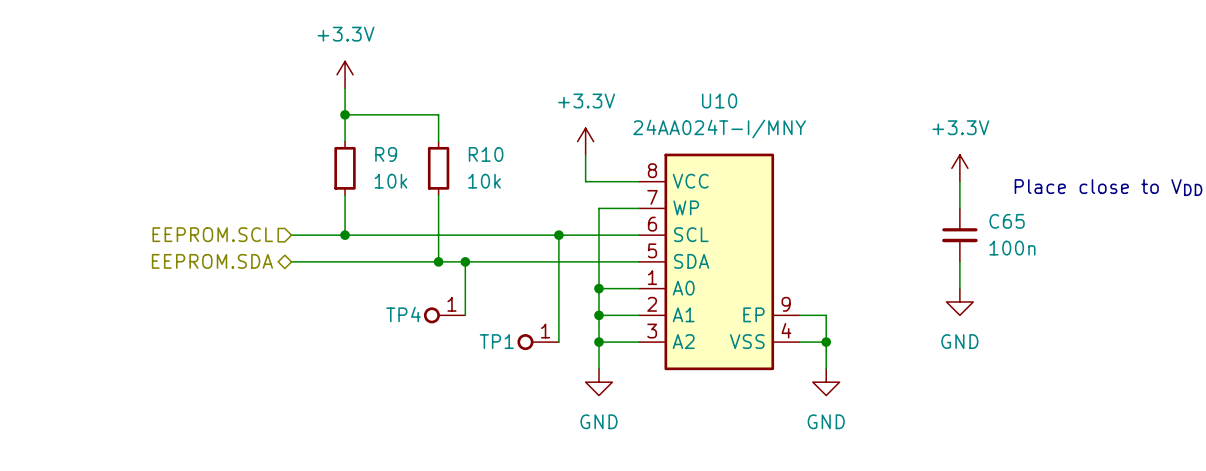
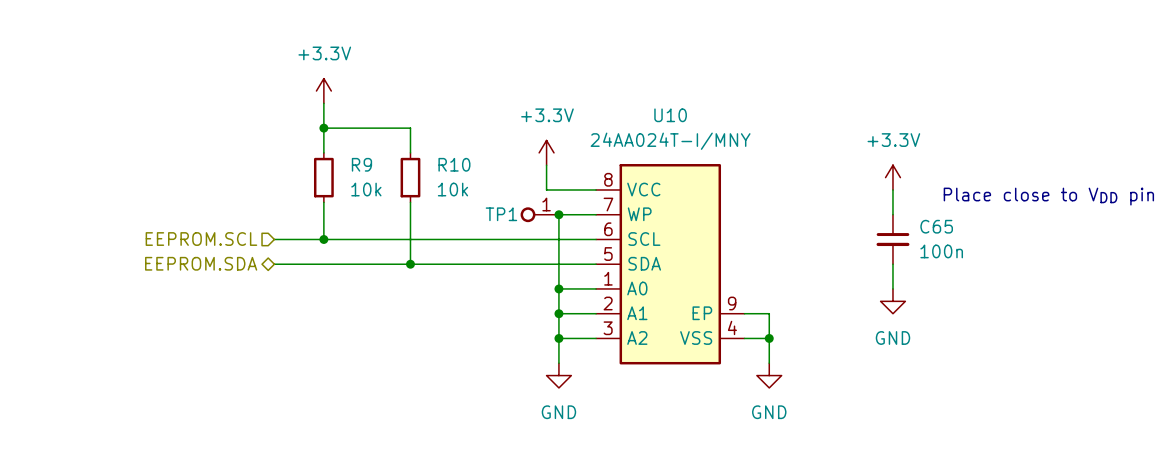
wire: (558, 235) (558, 342) -> none
junction position: (558, 235) -> (558, 214)
wire: (465, 261) (465, 315) -> none
junction: (465, 261) -> none
TP4: (444, 315) -> none
TP1 position: (538, 342) -> (539, 214)

